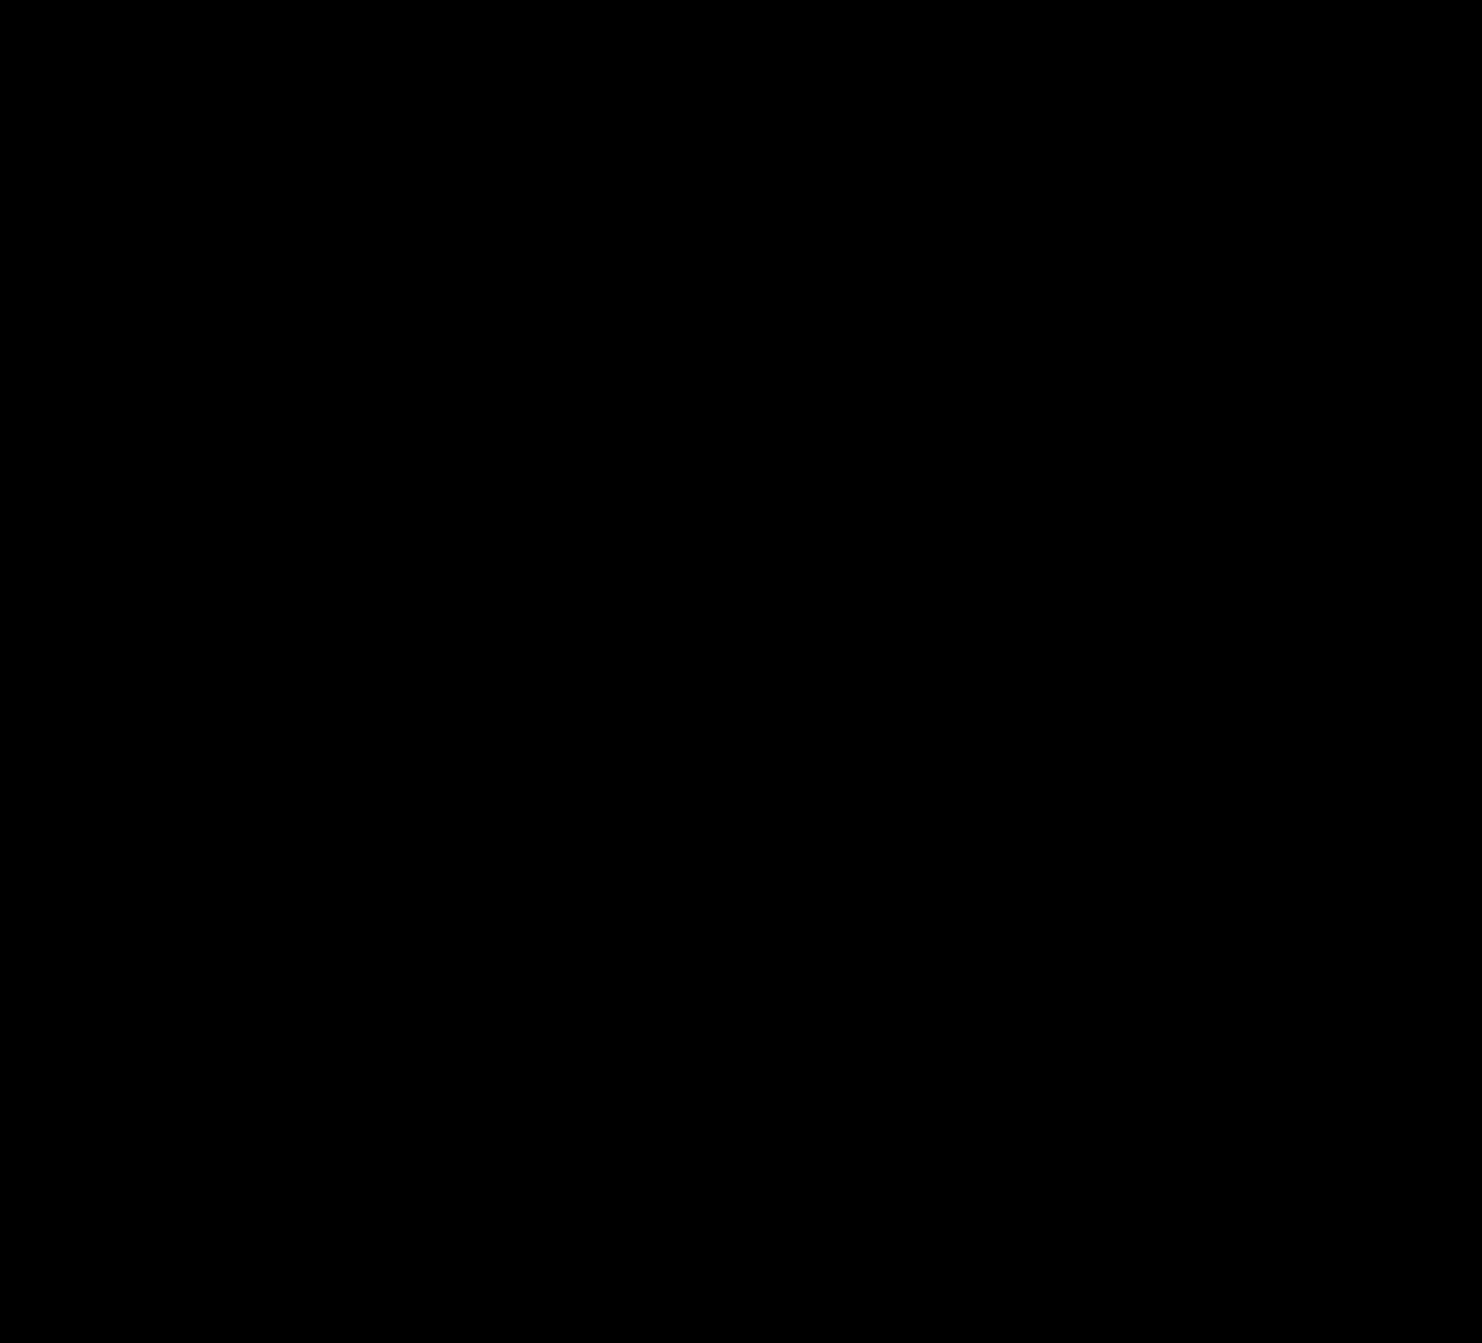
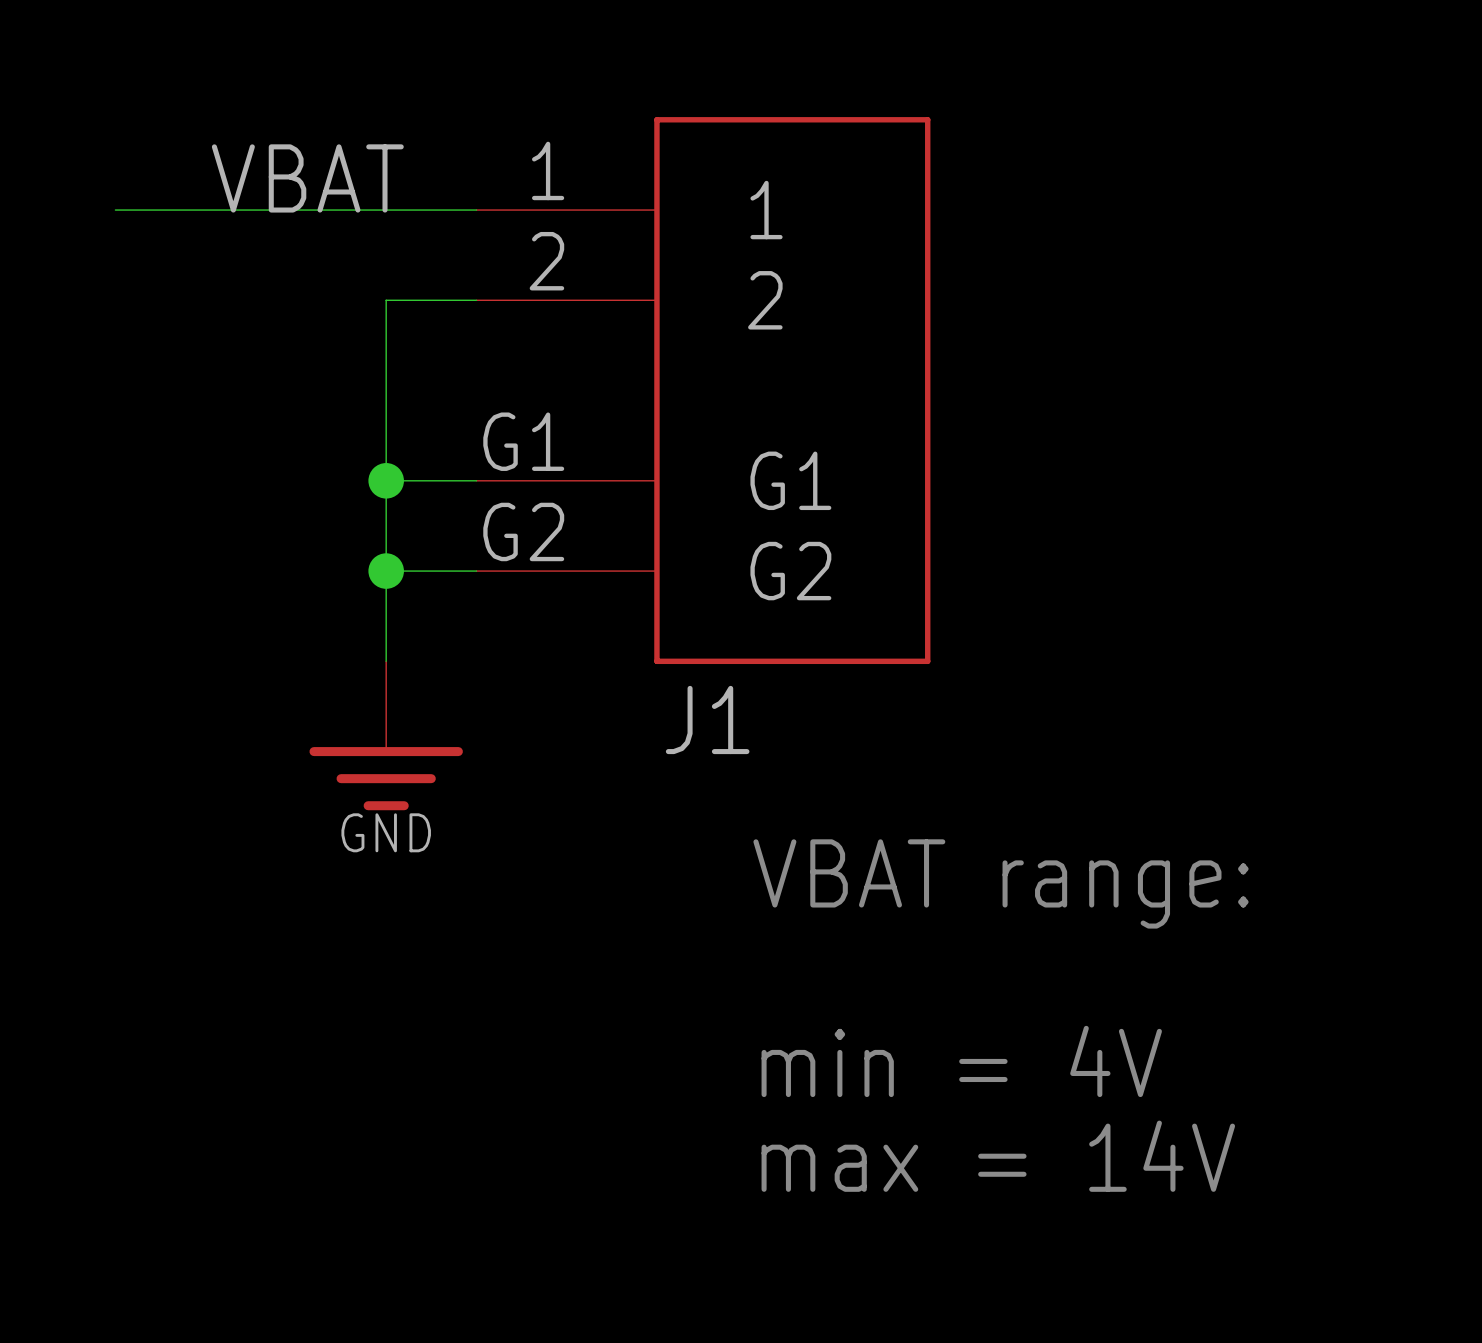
label: none -> VBAT (307, 178)
wire: none -> (115, 210) (476, 210)
wire: none -> (476, 300) (386, 300) (386, 661)
J1: none -> (703, 390)
wire: none -> (386, 480) (476, 480)
junction: none -> (386, 480)
wire: none -> (386, 571) (476, 571)
junction: none -> (386, 571)
power symbol: none -> GND (386, 735)
text: none -> VBAT range: (1000, 883)
text: none -> min = 4V (961, 1061)
text: none -> max = 14V (998, 1156)

